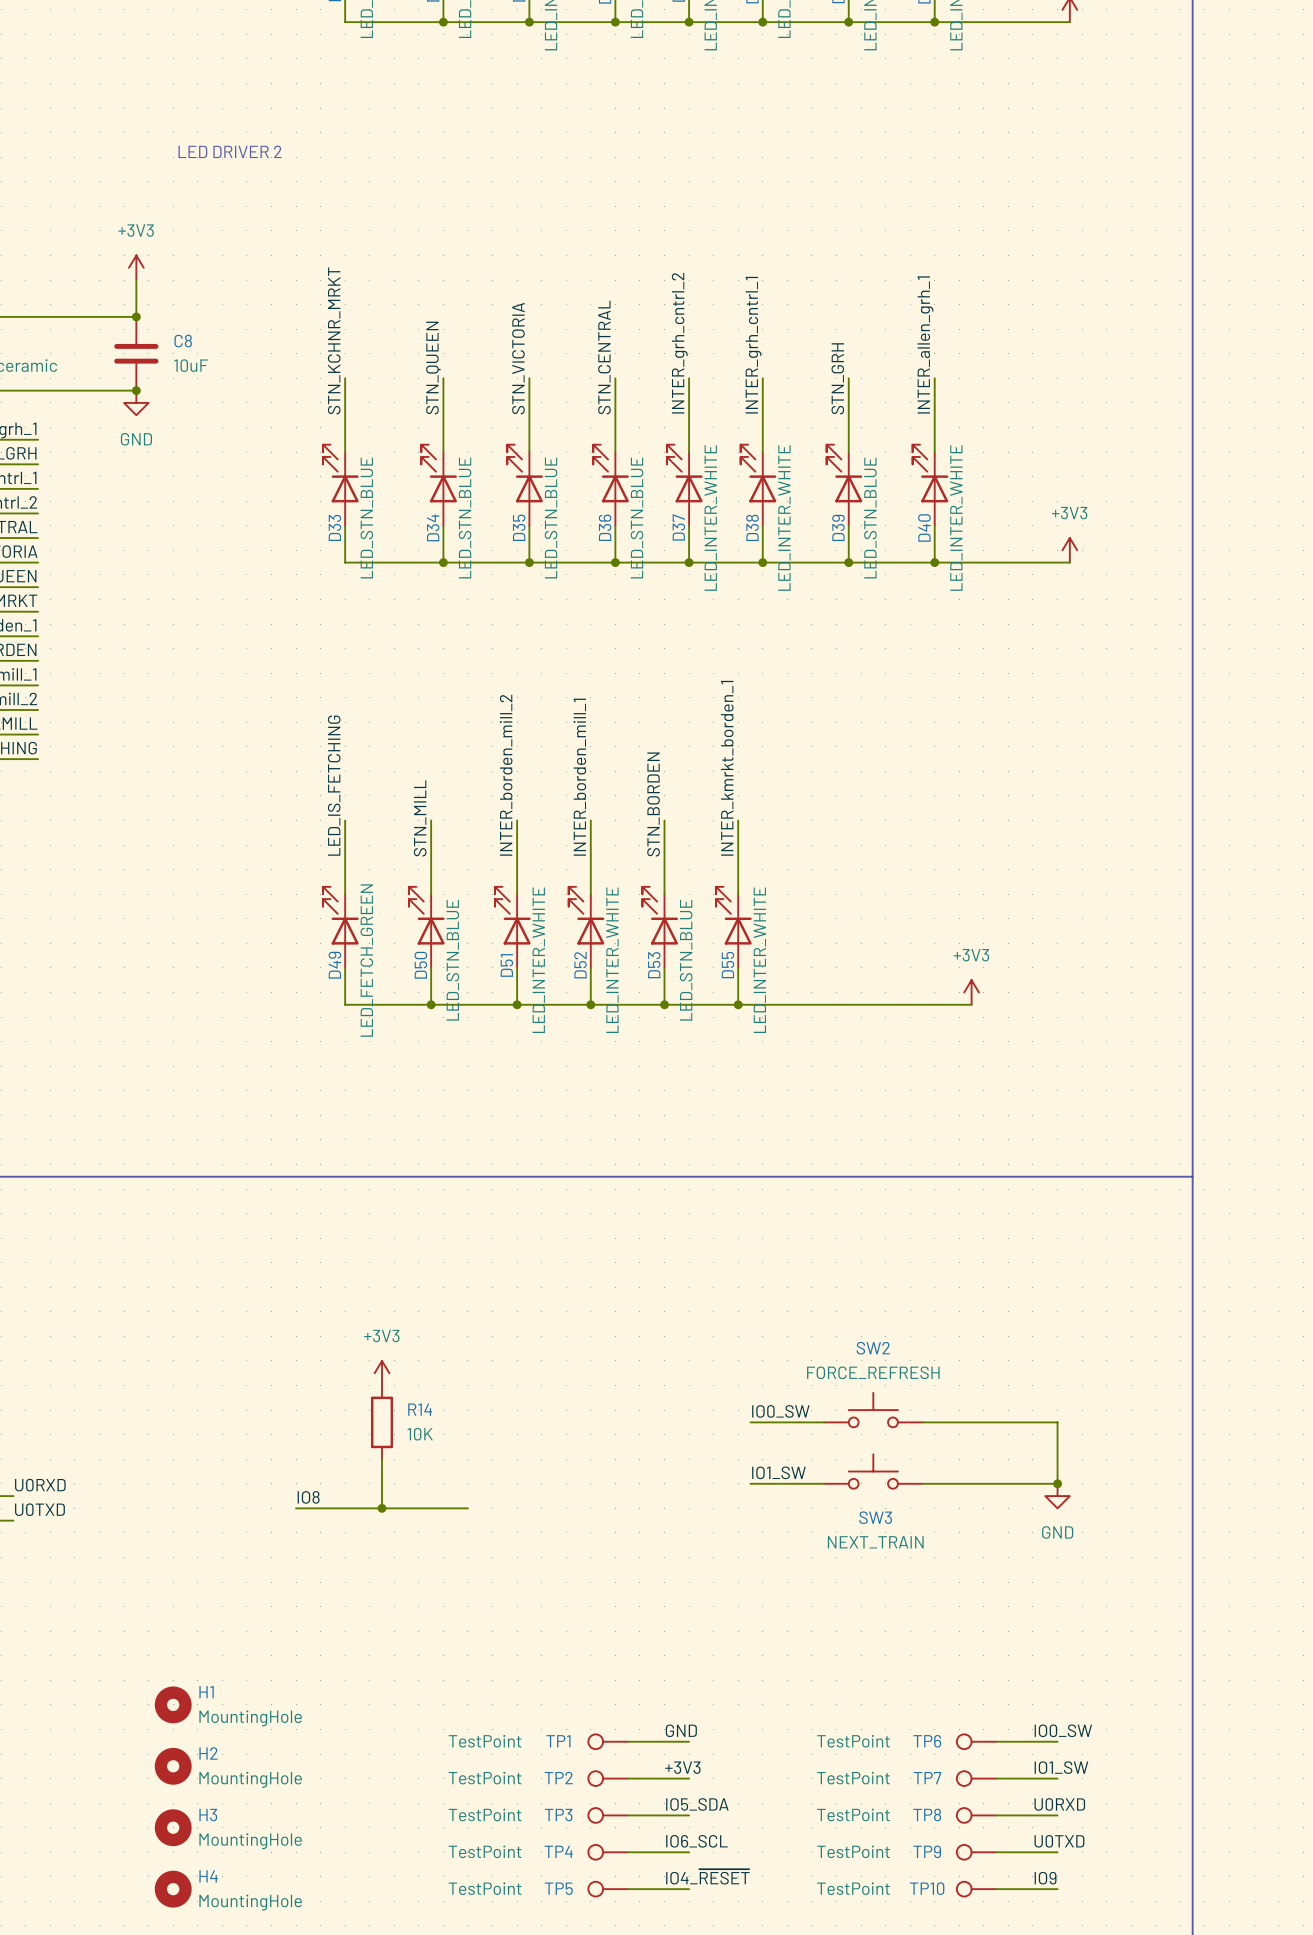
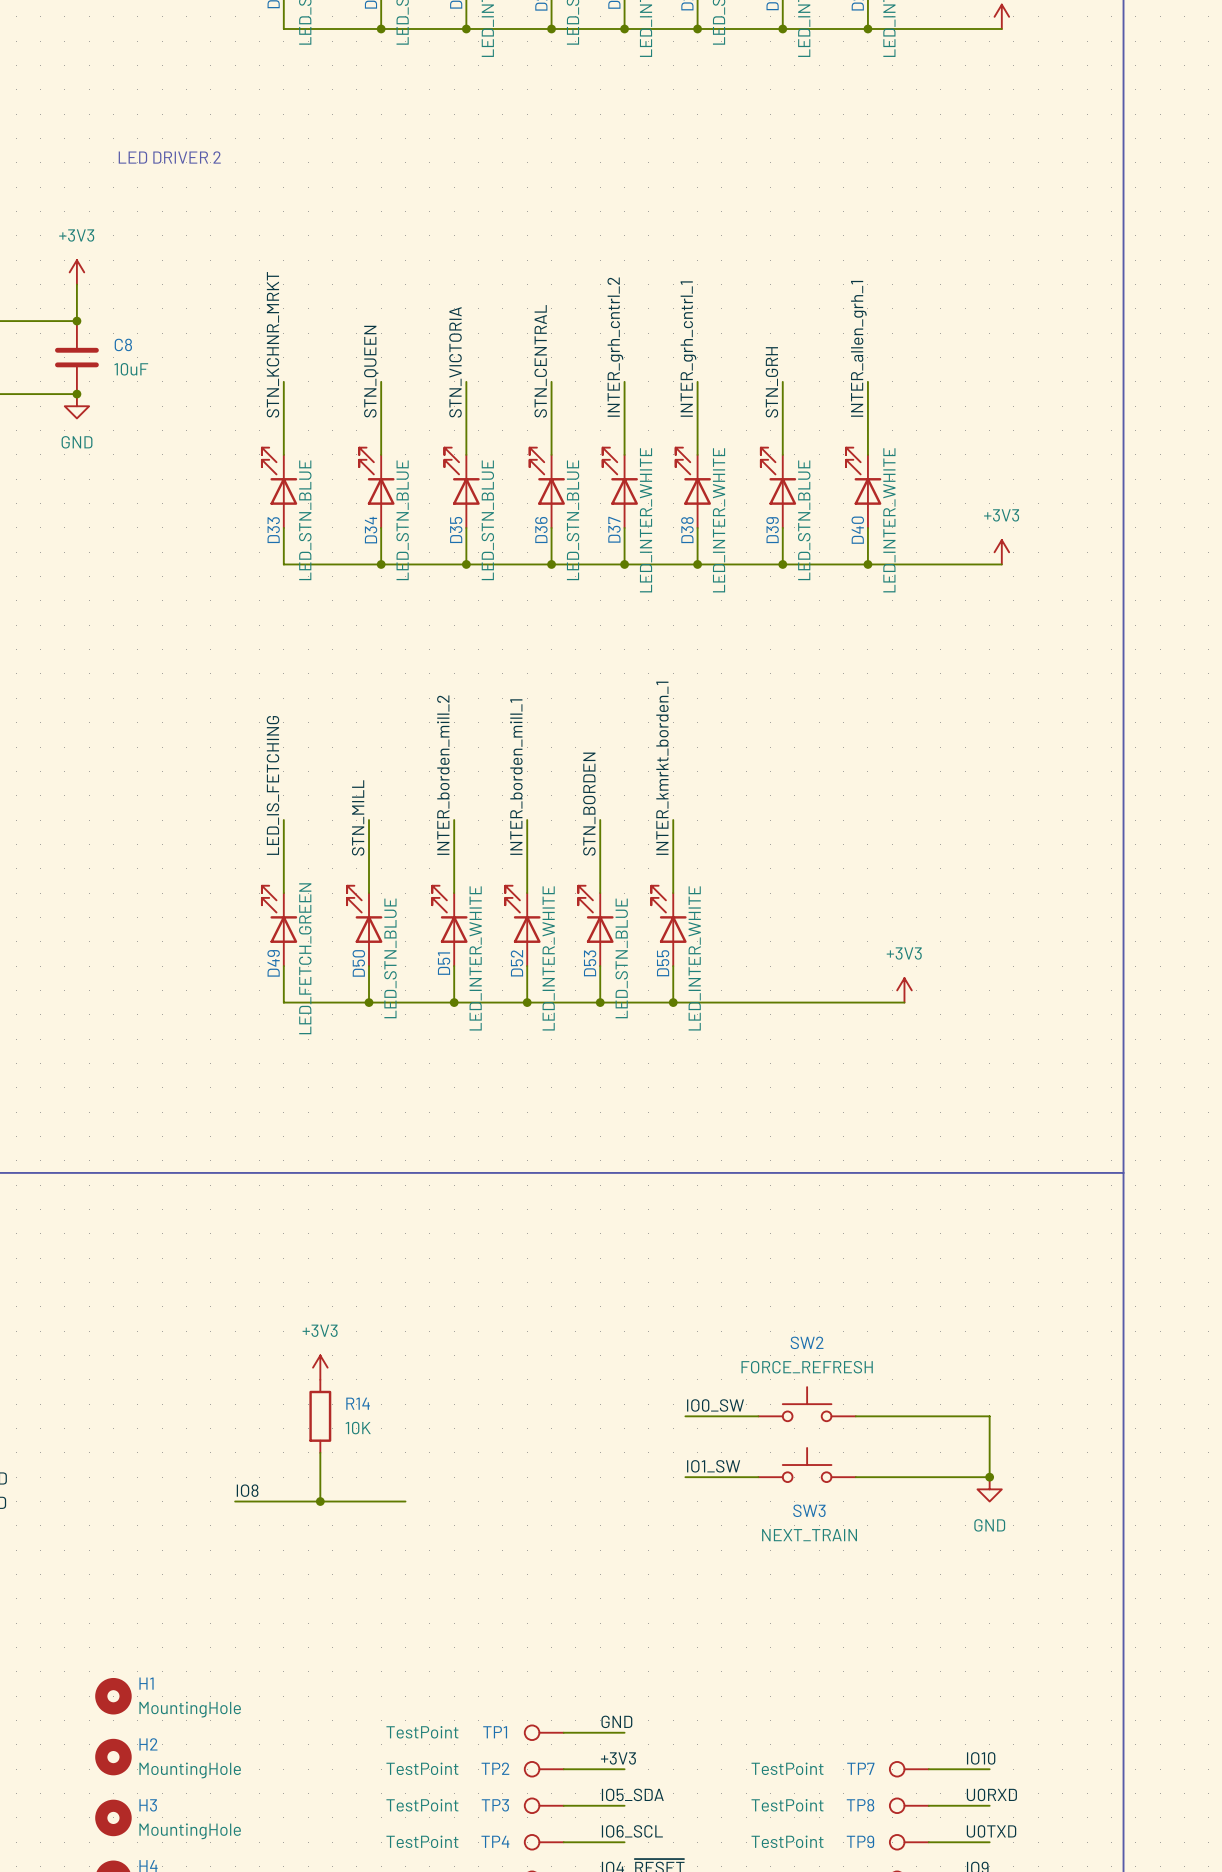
label: IO0_SW (1063, 1730) -> none
TP6: TestPoint (976, 1741) -> none
wire: (996, 1741) (1057, 1741) -> none
label: IO1_SW (1061, 1767) -> IO10 (981, 1758)

